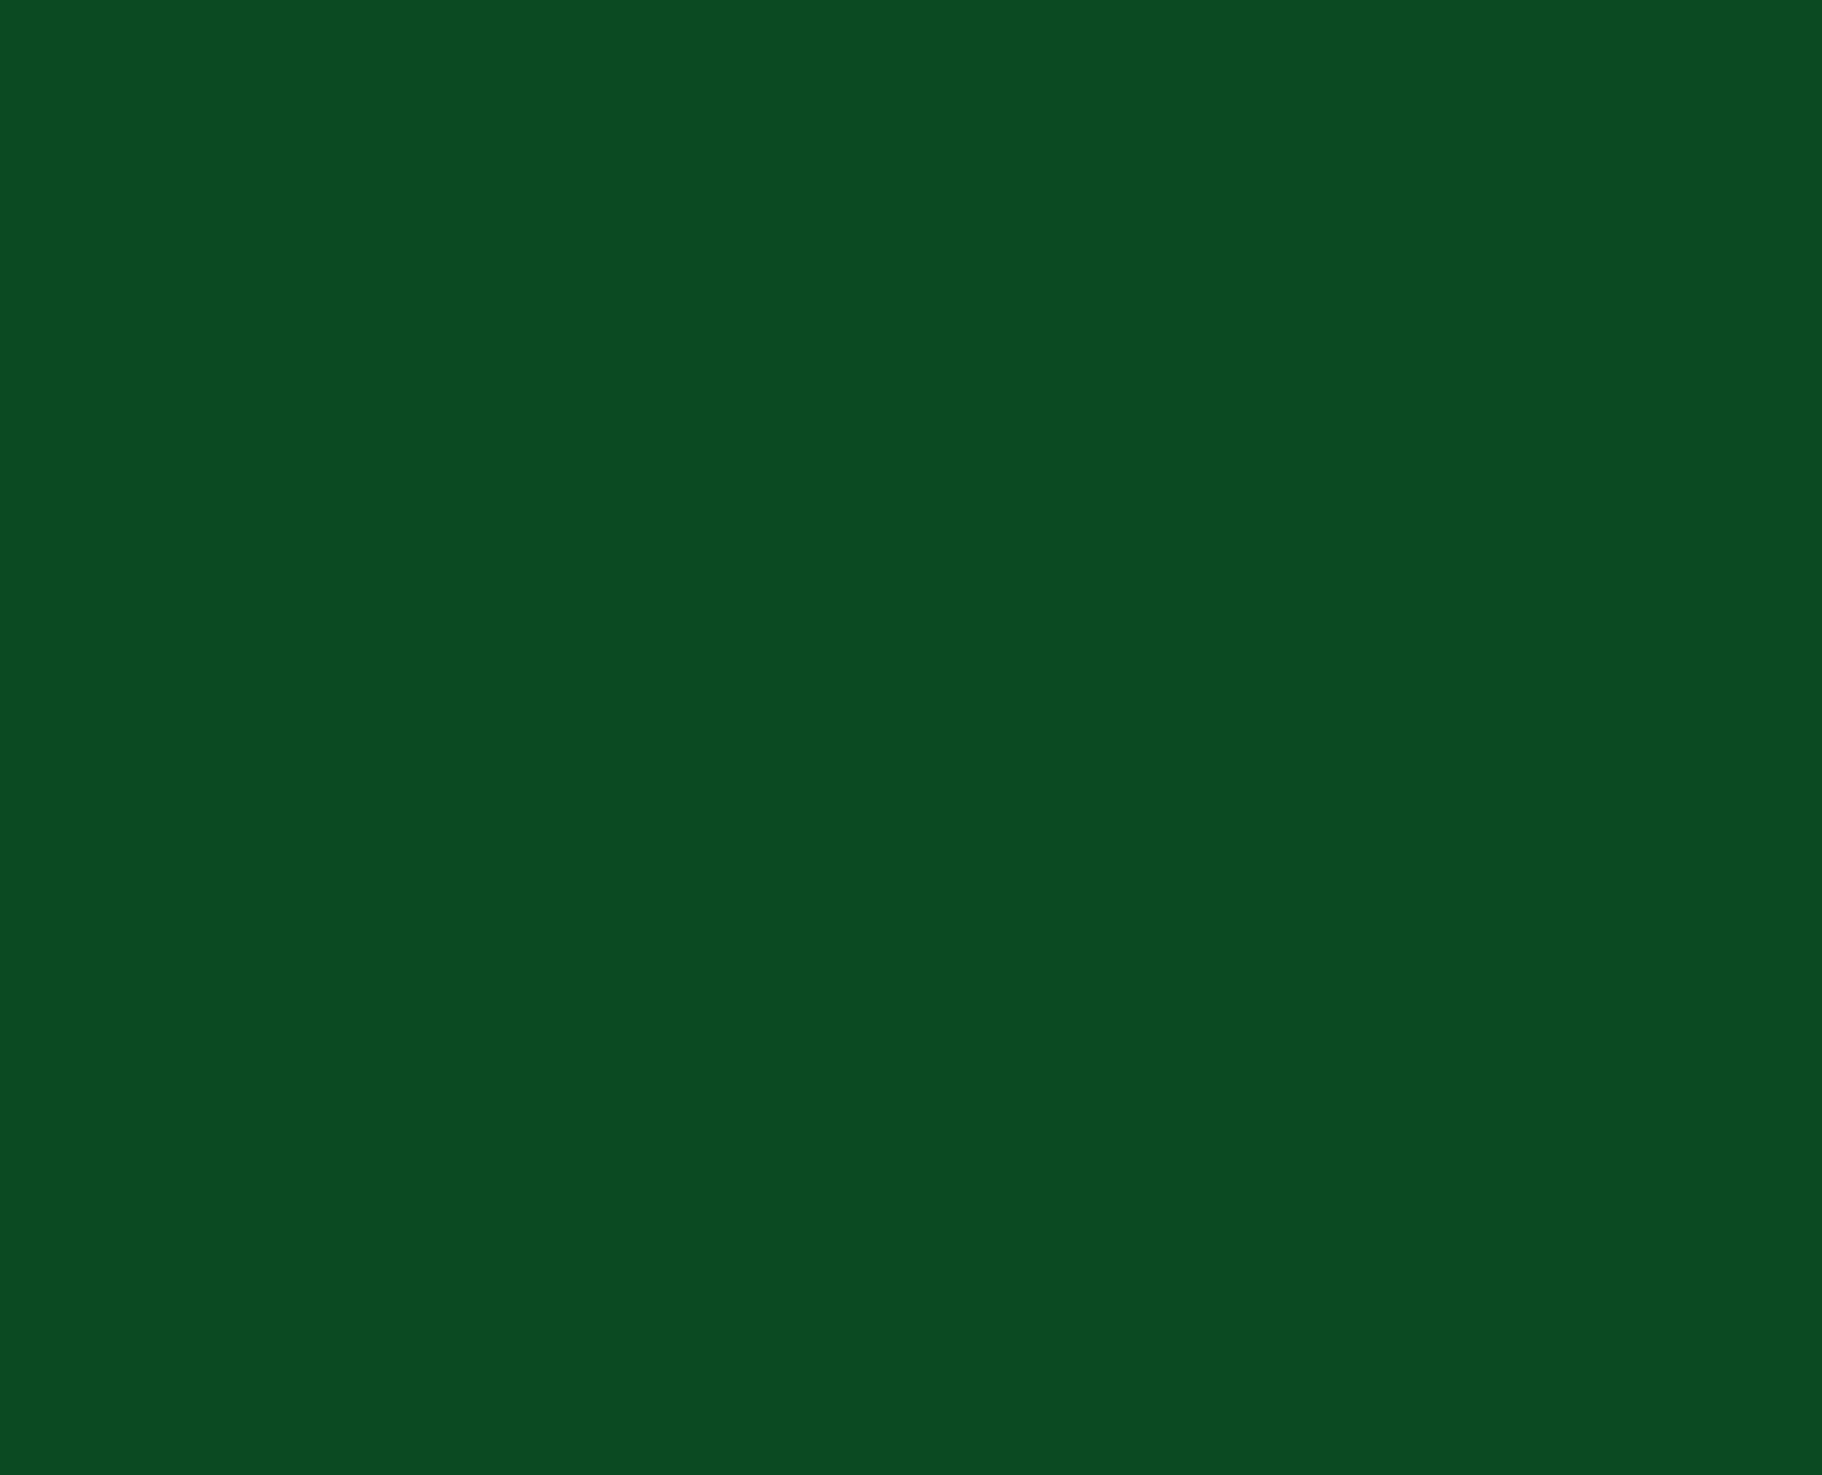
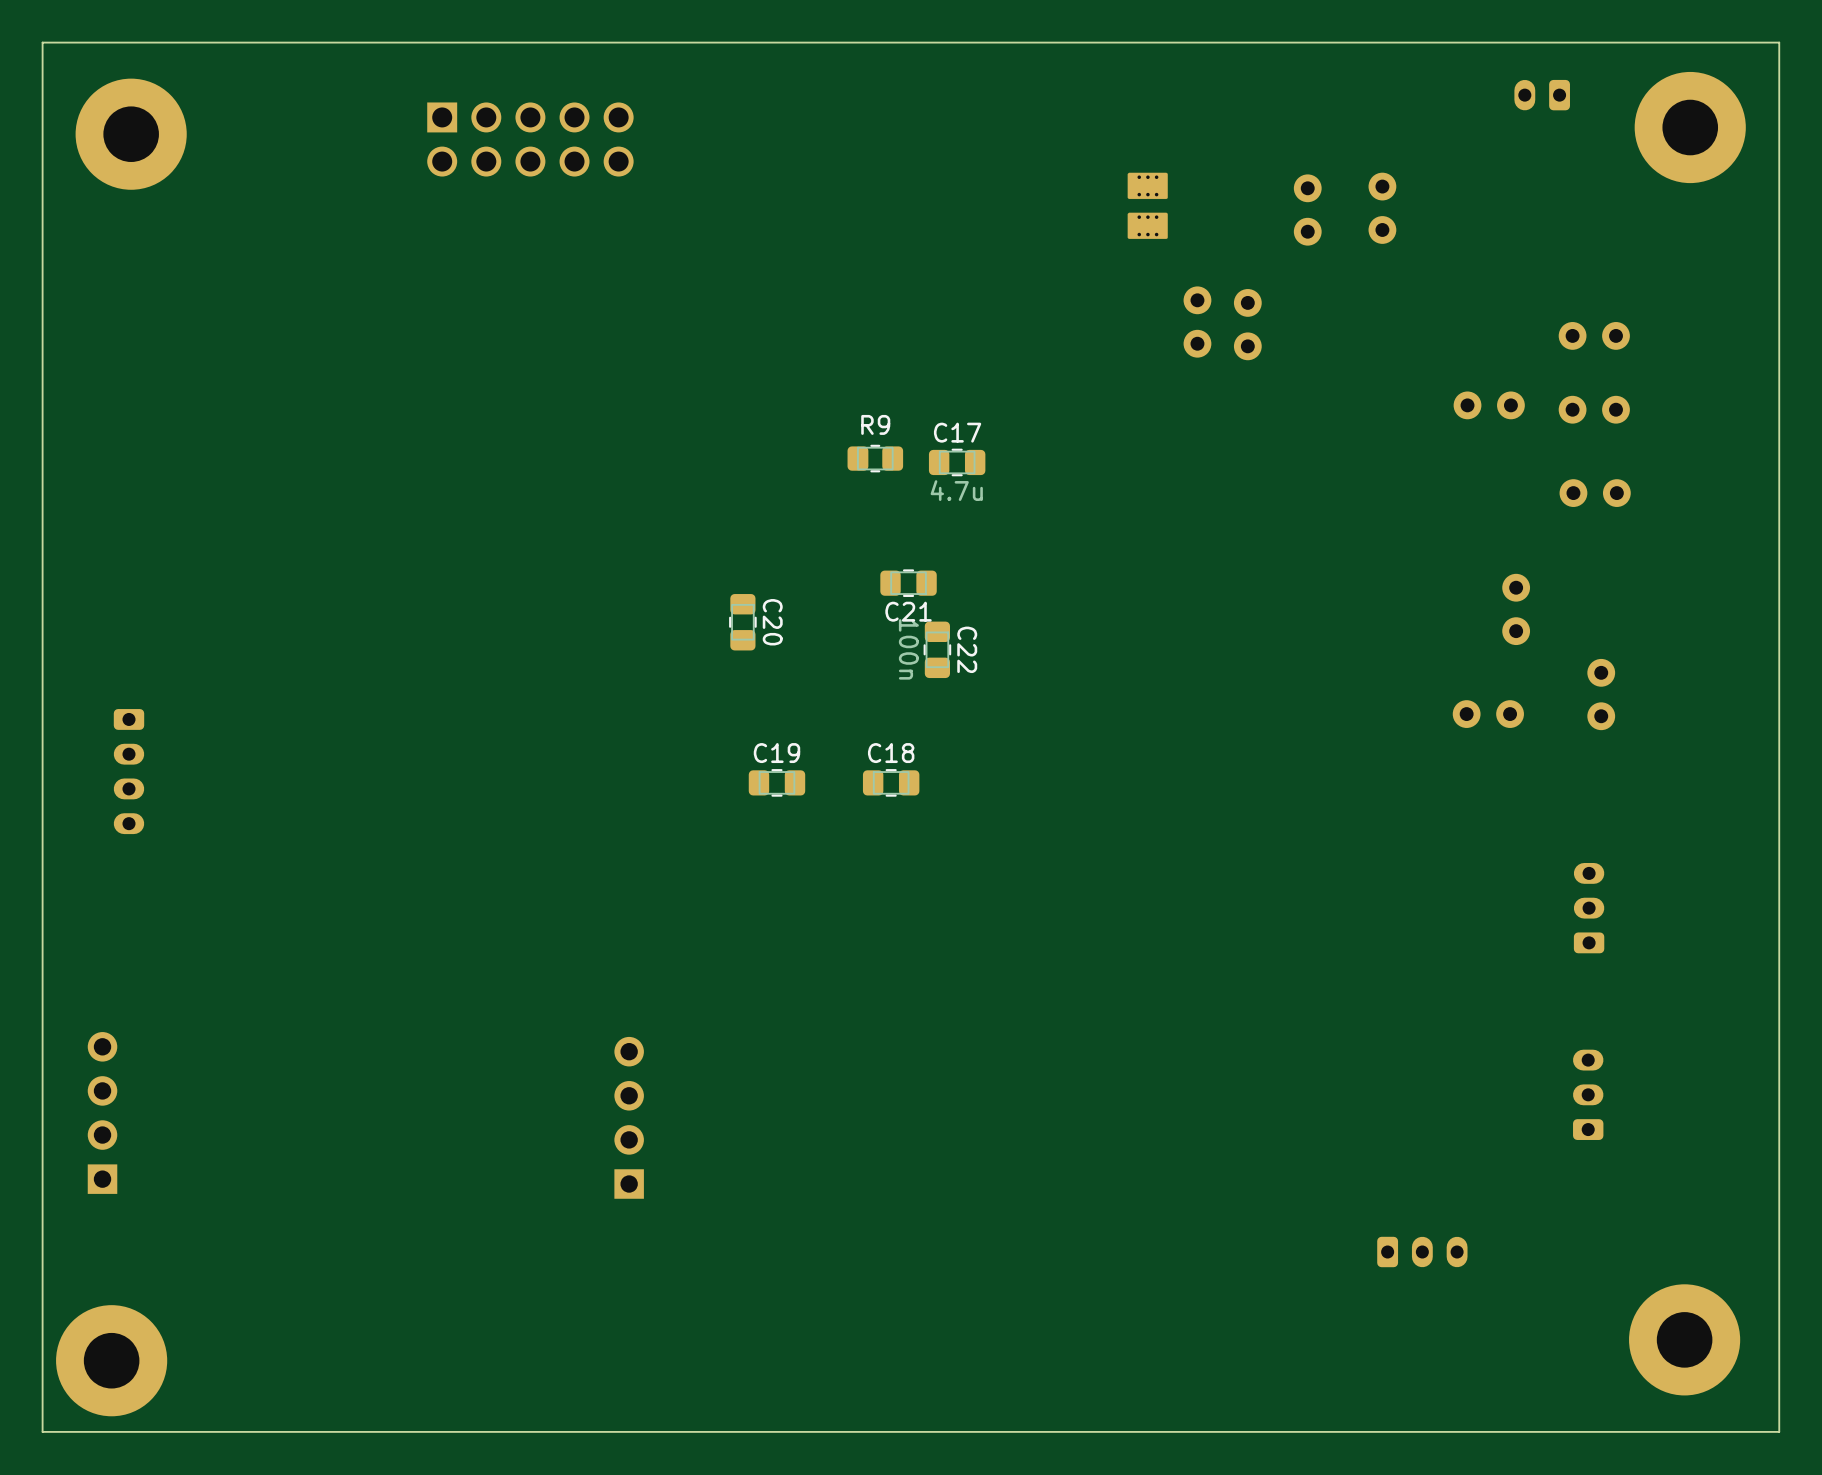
board edge: none -> (1779, 42) (42, 42) (42, 1431) (1779, 1431) (1779, 42)
part: none -> (1542, 95)
part: none -> (1690, 127)
part: none -> (131, 134)
part: none -> (530, 139)
part: none -> (1147, 205)
part: none -> (1382, 208)
part: none -> (1307, 210)
part: none -> (1197, 322)
part: none -> (1247, 324)
part: none -> (1594, 335)
part: none -> (1489, 405)
part: none -> (1594, 409)
R9: none -> (875, 458)
C17: none -> 4.7u (957, 462)
part: none -> (1595, 493)
C21: none -> (908, 583)
part: none -> (1516, 609)
C20: none -> (742, 622)
C22: none -> 100n (937, 649)
part: none -> (1601, 694)
part: none -> (1488, 714)
part: none -> (128, 771)
C19: none -> (776, 782)
C18: none -> (891, 782)
part: none -> (1589, 908)
part: none -> (1588, 1094)
part: none -> (102, 1112)
part: none -> (629, 1117)
part: none -> (1422, 1252)
part: none -> (1684, 1339)
part: none -> (111, 1360)

